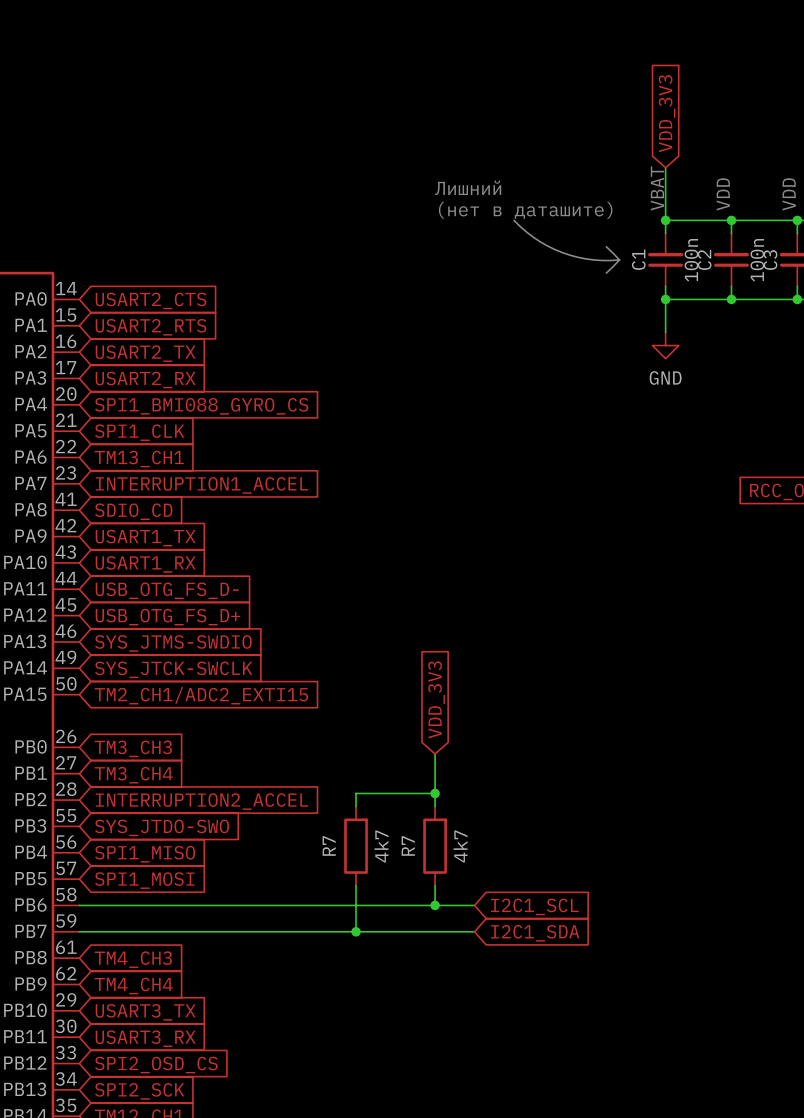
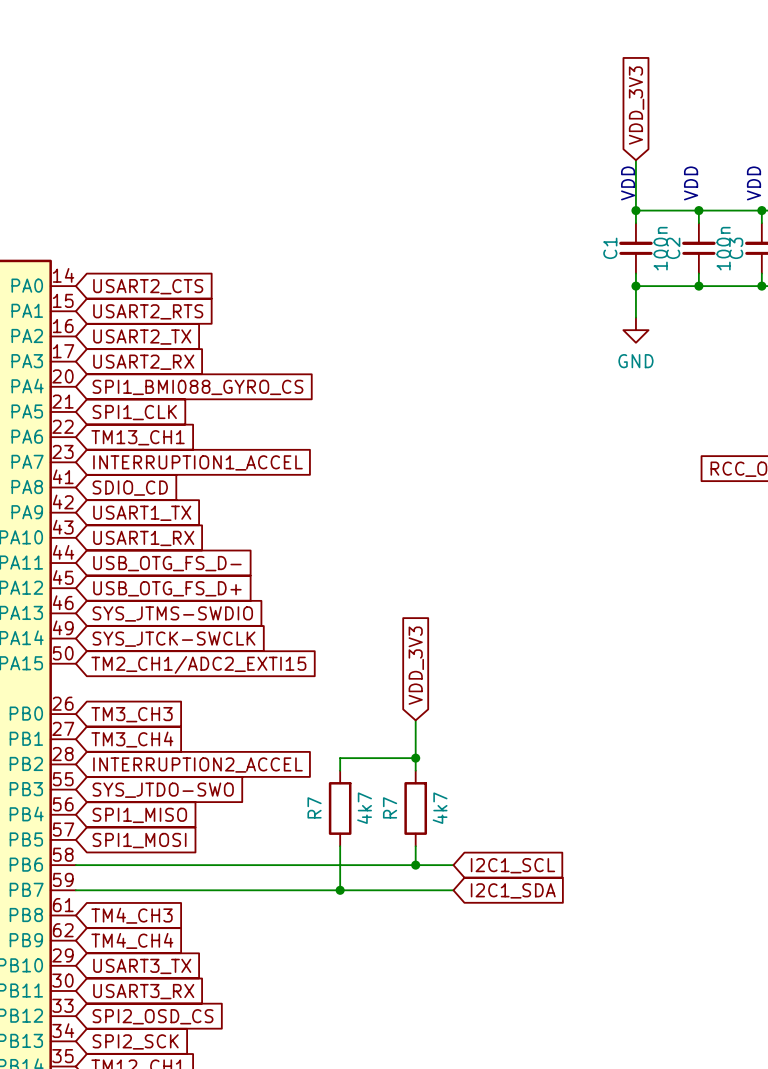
text: Лишний (468, 187) -> none
text: VBAT (657, 188) -> VDD (628, 183)
text: (нет в даташите) (525, 210) -> none
line: (514, 220) (539, 241) (562, 252) (586, 258) (619, 259) -> none
line: (606, 246) (619, 259) -> none
line: (619, 259) (606, 273) -> none

